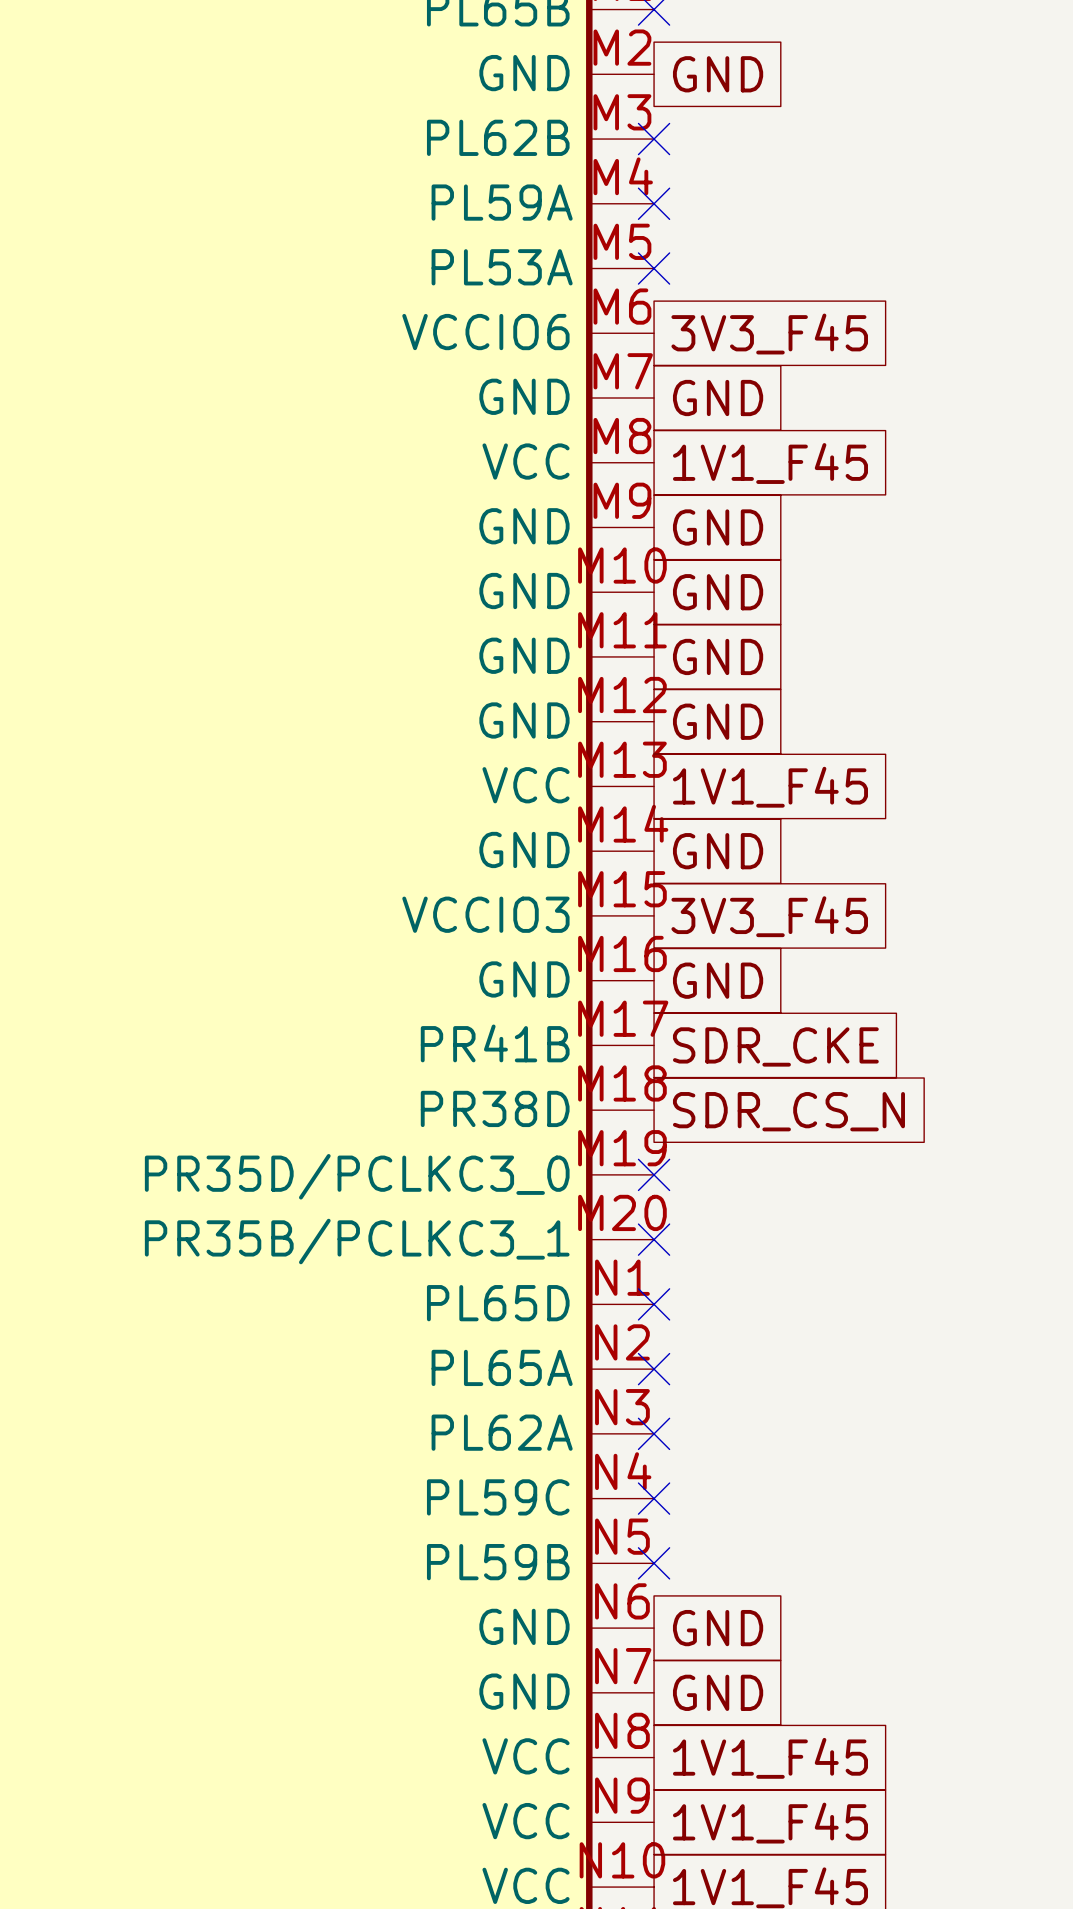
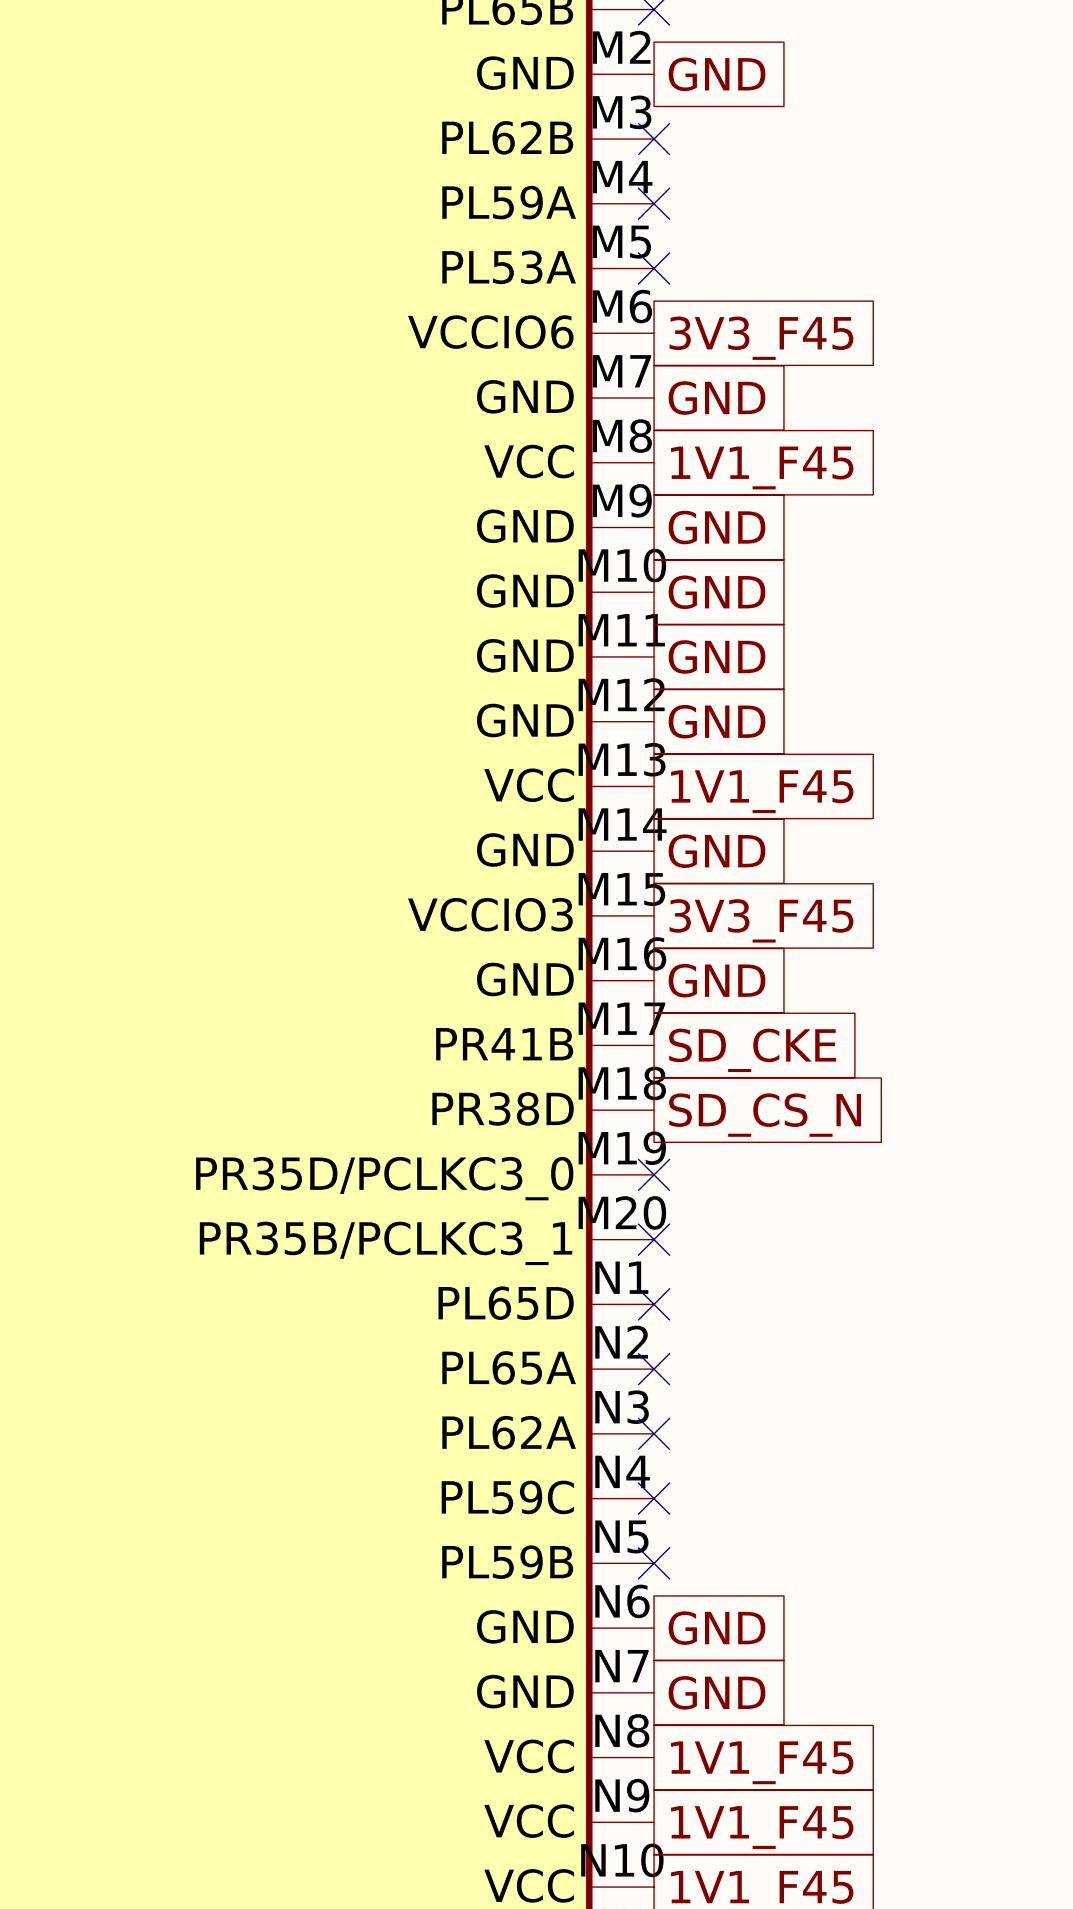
global label: SDR_CKE (775, 1046) -> SD_CKE (752, 1050)
global label: SDR_CS_N (788, 1111) -> SD_CS_N (765, 1115)

